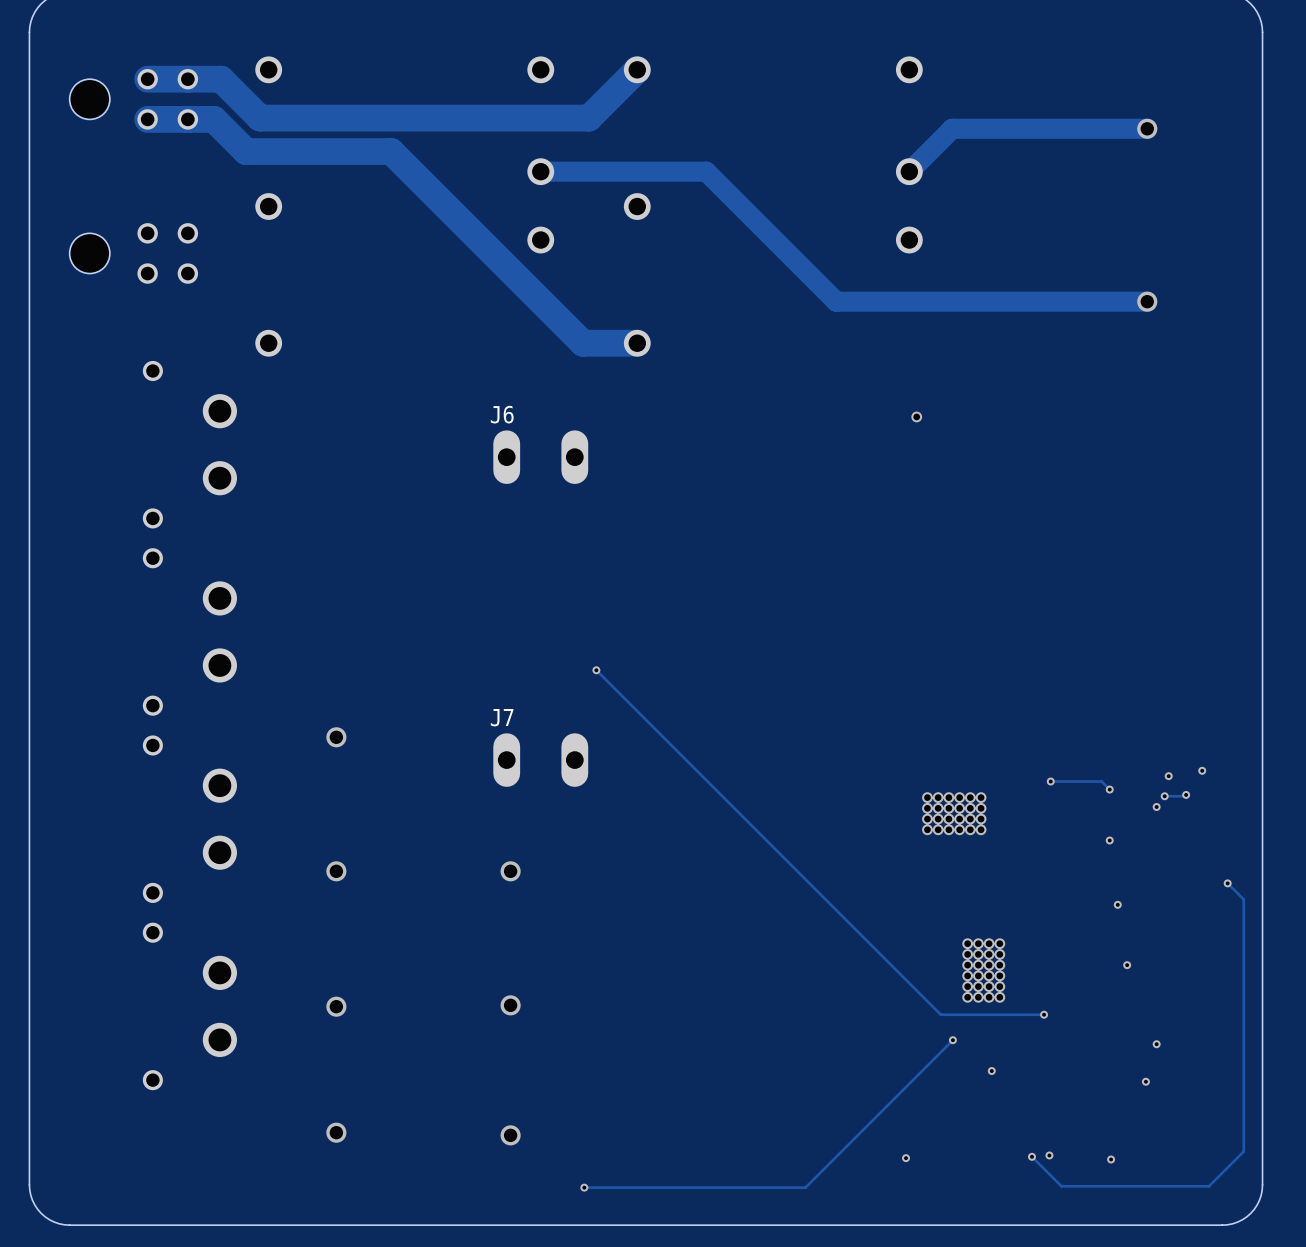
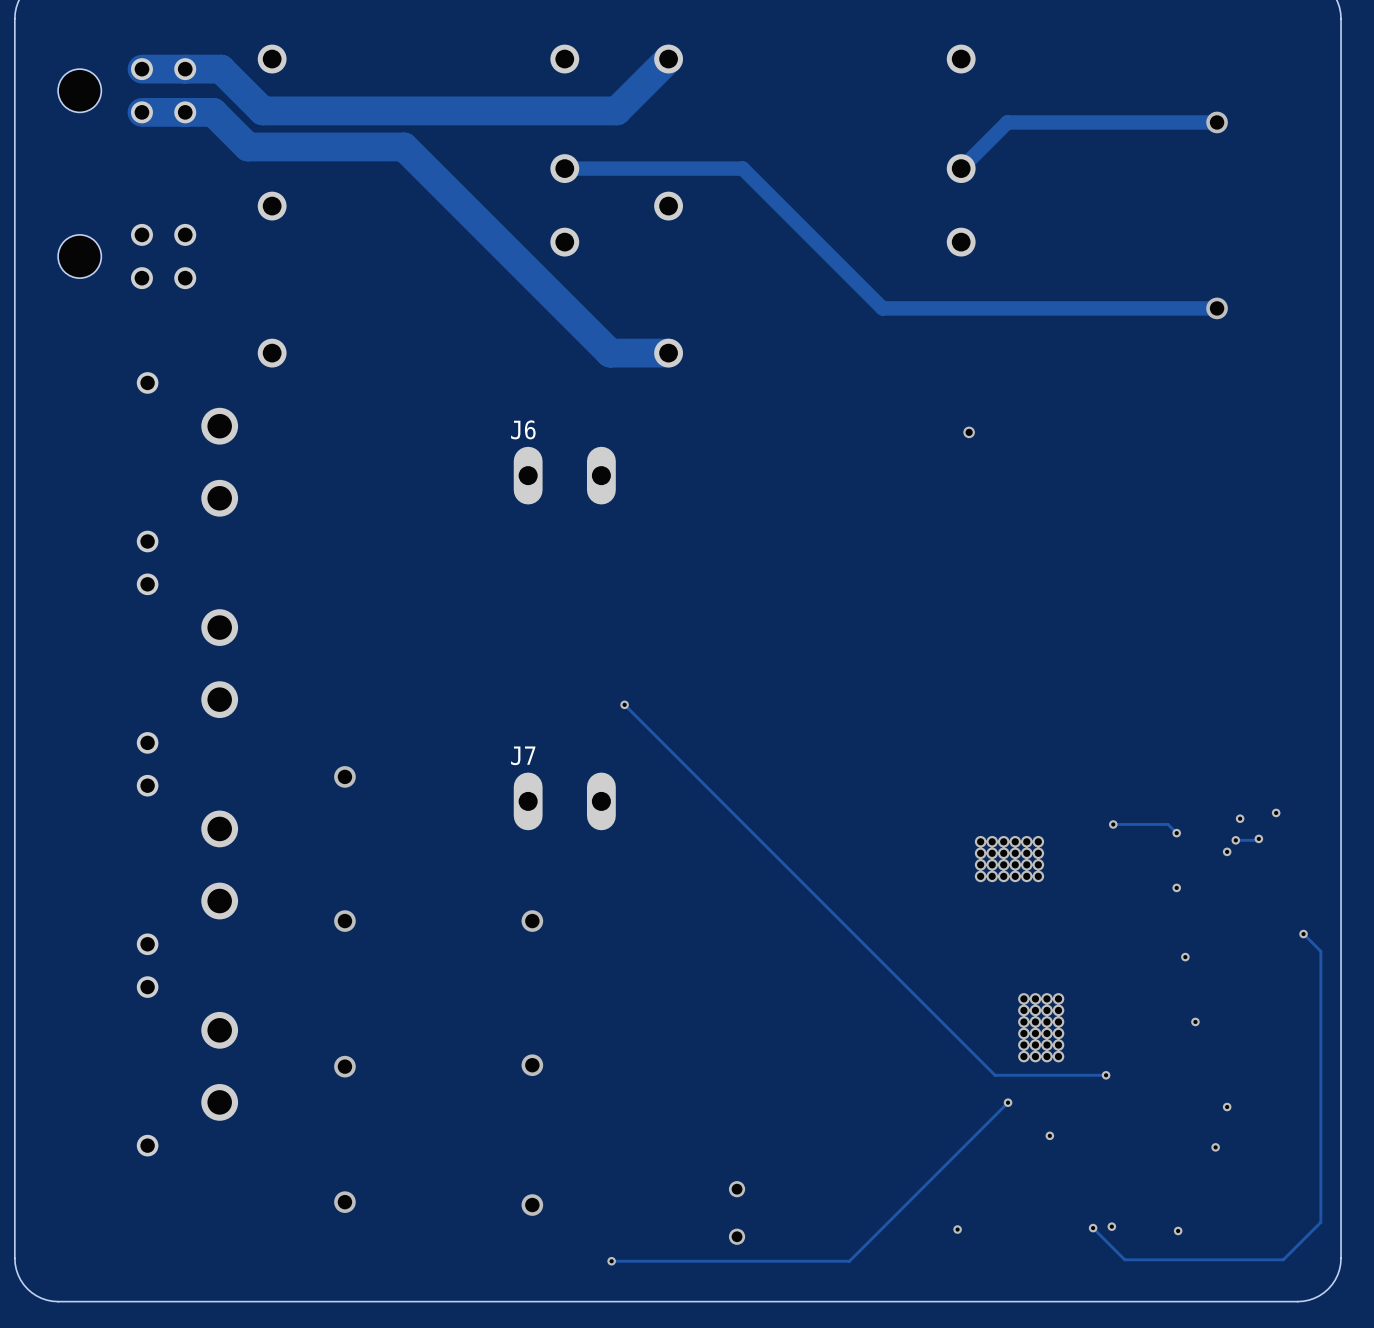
track width: thick (1147, 128) (952, 128) (909, 171) -> thin (1217, 122) (1007, 122) (961, 168)
track width: thick (540, 171) (706, 171) (836, 301) (1147, 301) -> thin (564, 168) (742, 168) (882, 308) (1217, 308)
via: none -> (737, 1189)
via: none -> (737, 1236)

